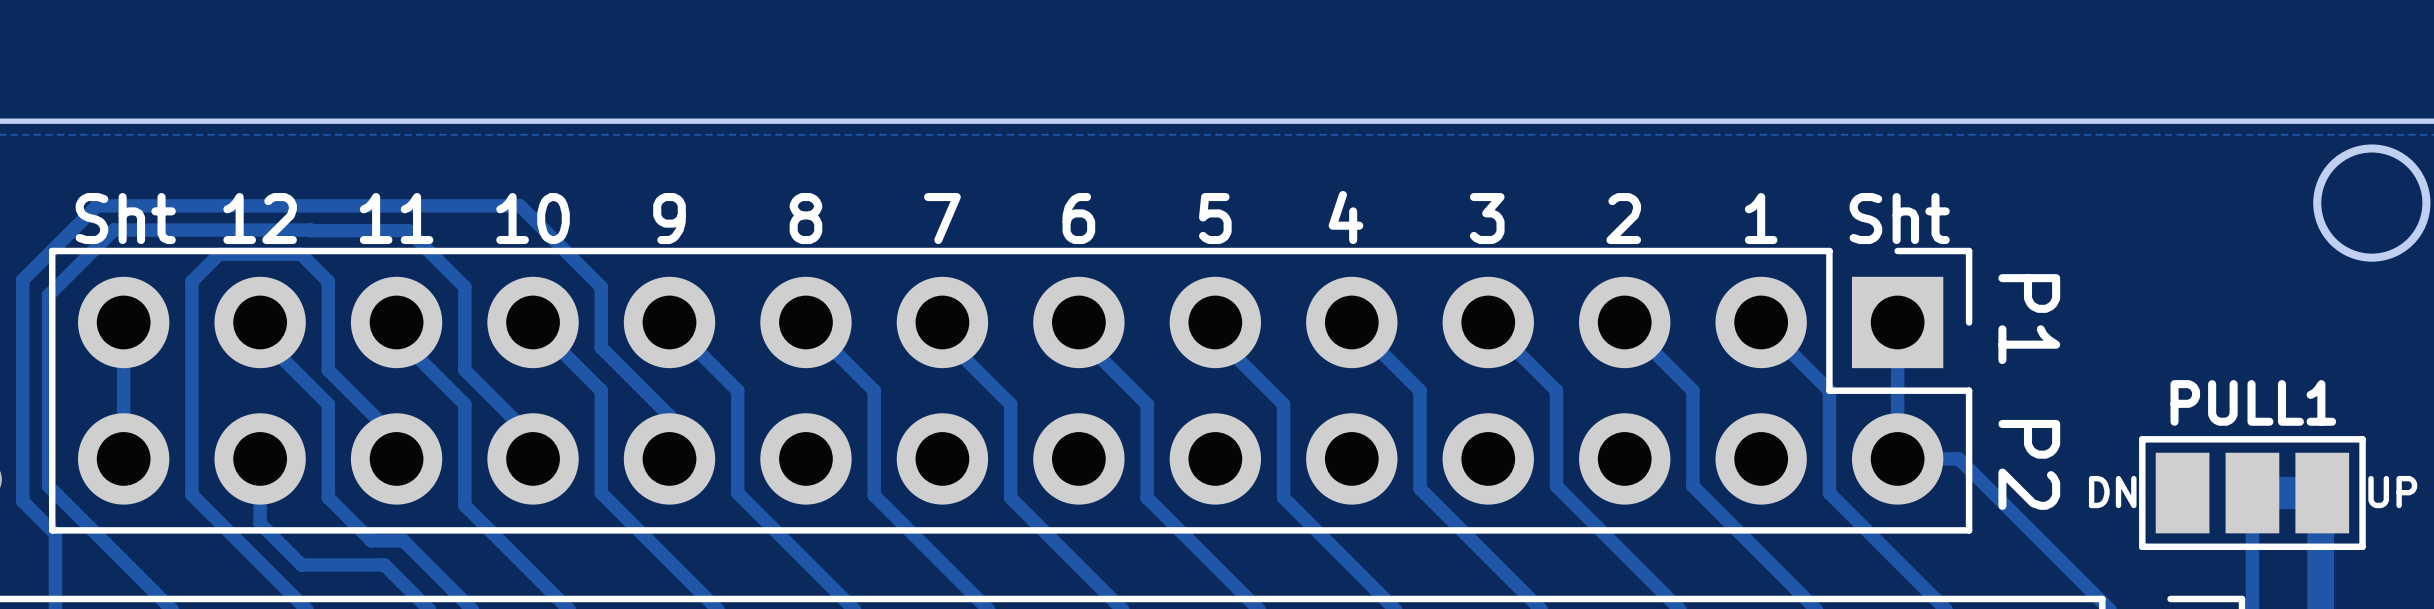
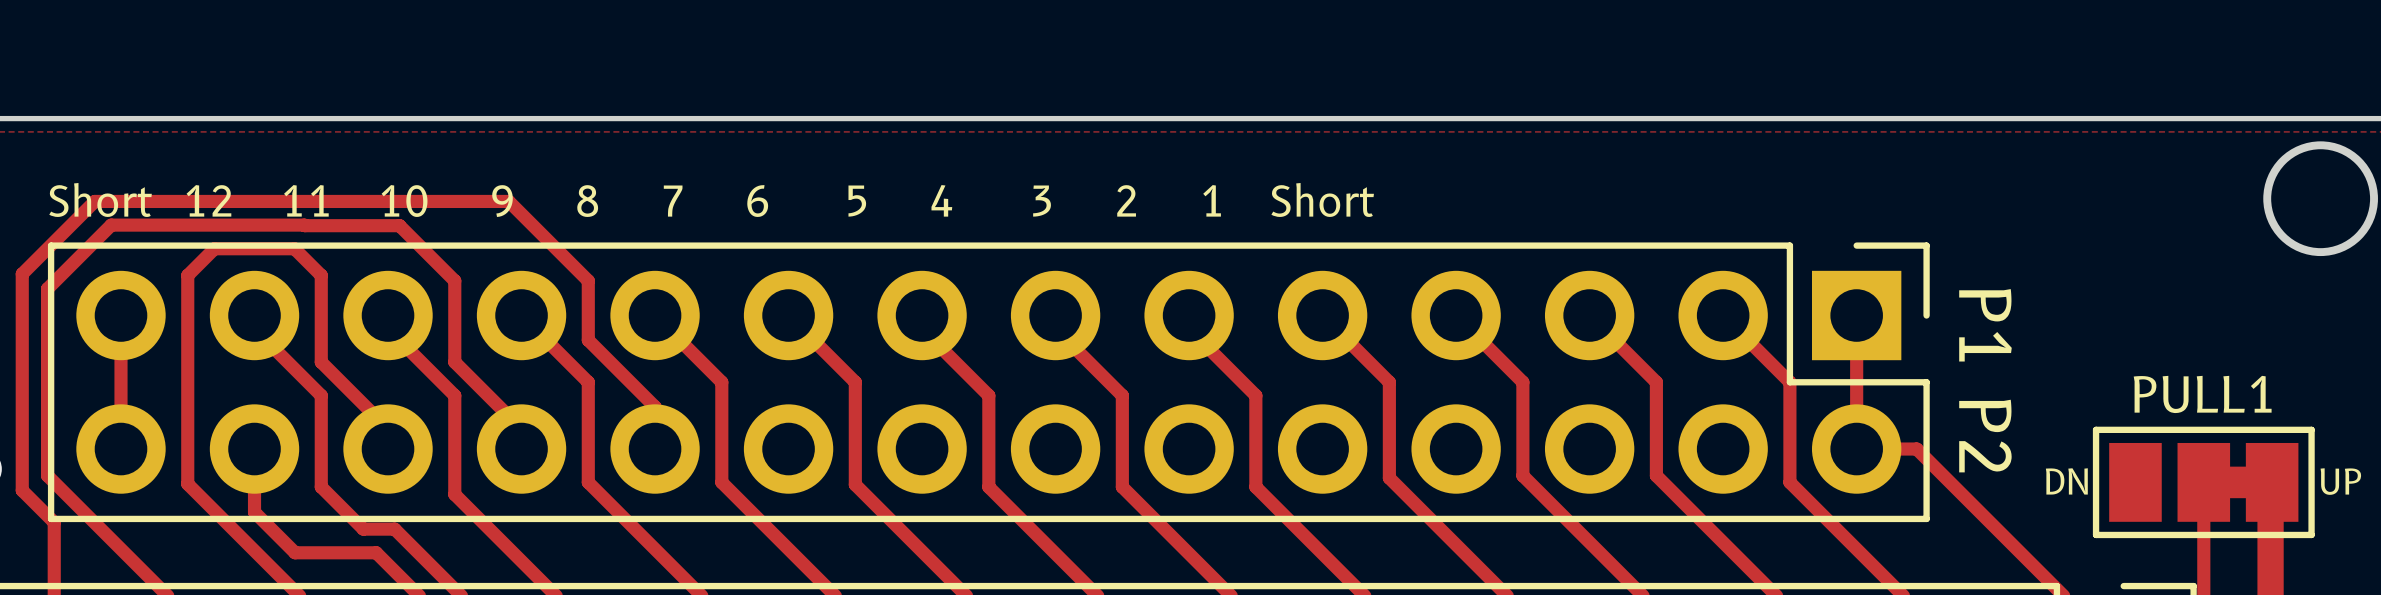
text: none -> Short 12 11 10 9 8 7 6 5 4 3 2 1 Short (711, 199)
text: 4 (1346, 217) -> none
text: Sht (125, 218) -> none
text: 12 (260, 218) -> none
text: 11 (396, 218) -> none
text: 10 (533, 218) -> none
text: 9 (669, 218) -> none
text: 8 (805, 218) -> none
text: 7 (942, 218) -> none
text: 6 (1078, 218) -> none
text: 5 (1215, 218) -> none
text: 3 (1487, 218) -> none
text: 2 (1623, 218) -> none
text: 1 (1761, 218) -> none
text: Sht (1899, 218) -> none

